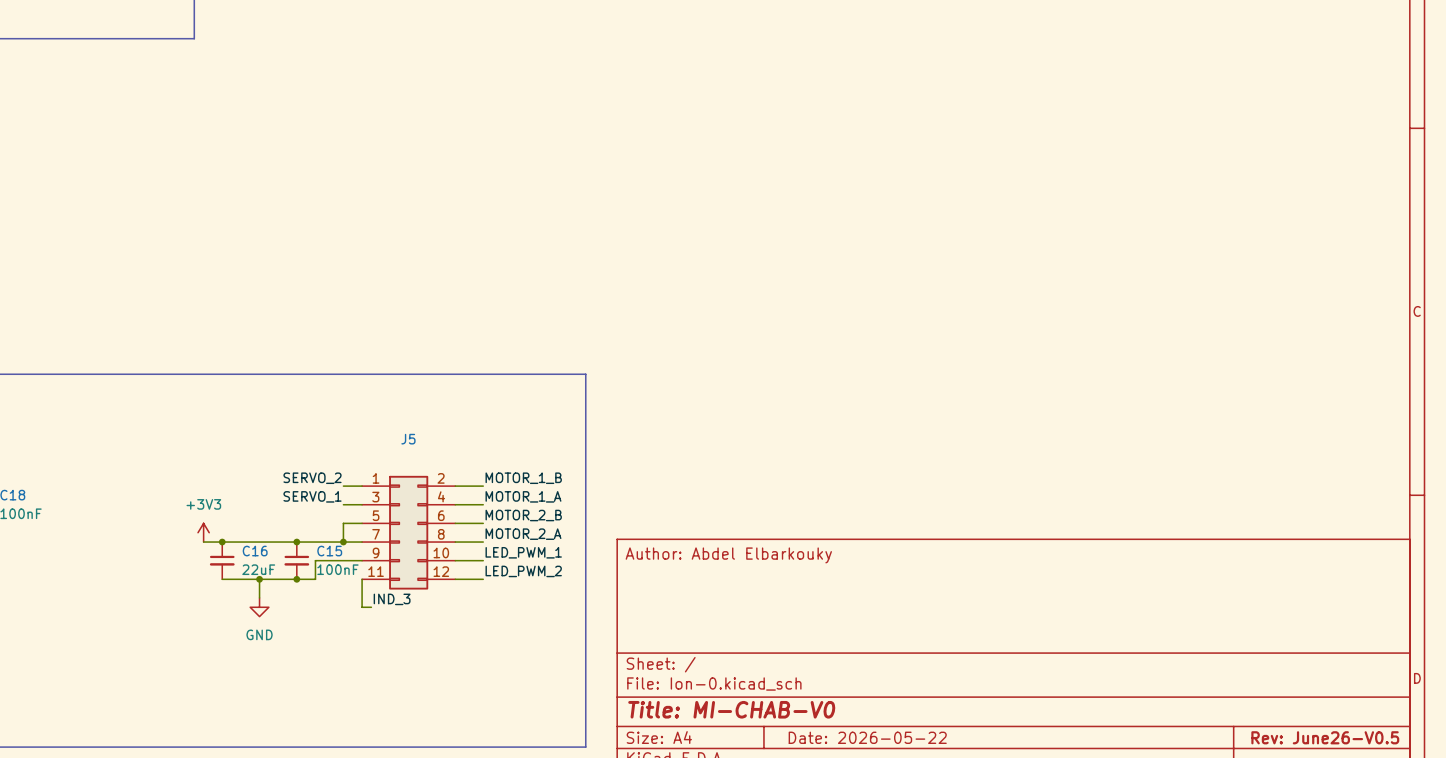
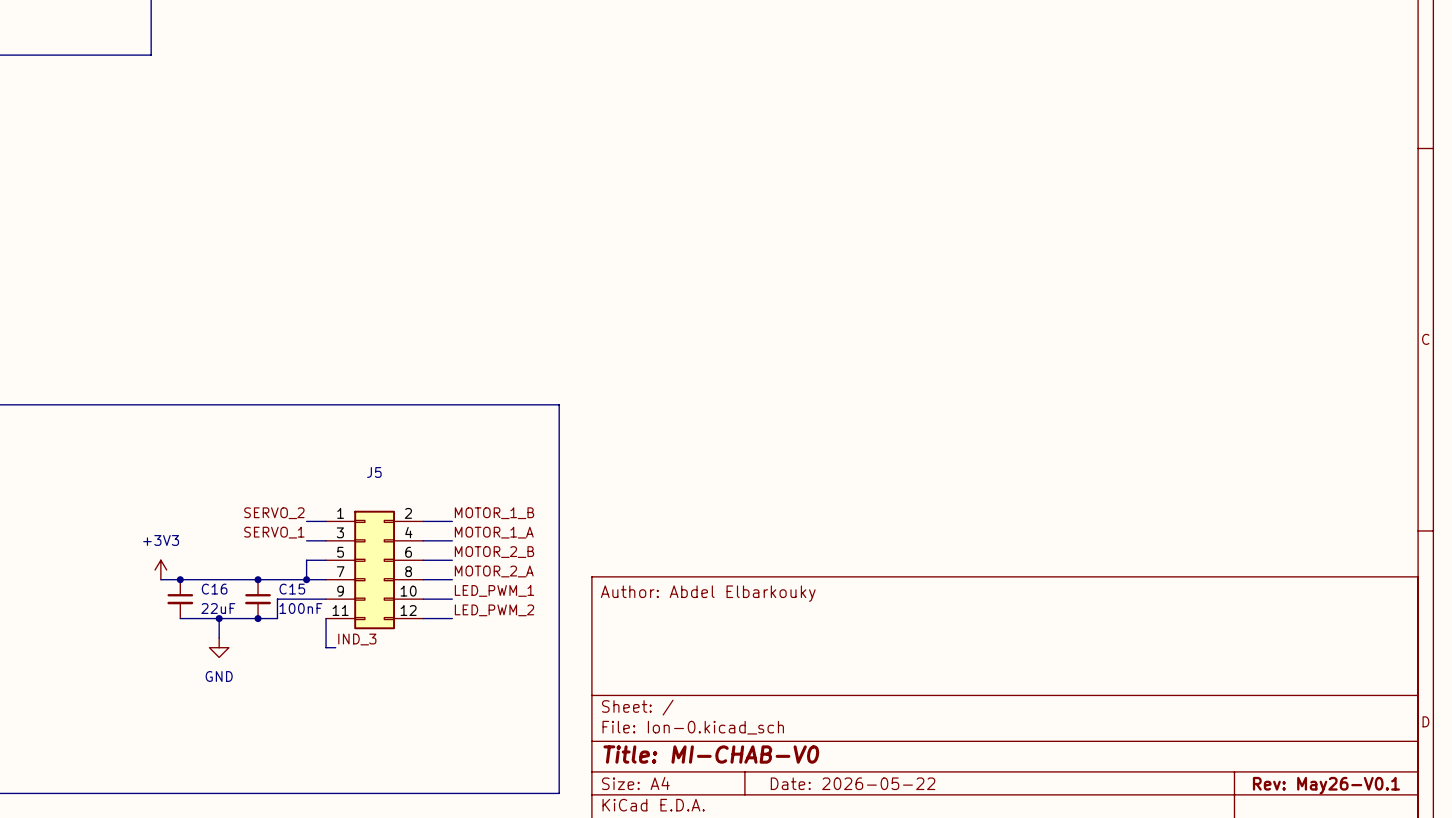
title block: Rev: June26-V0.5 (1325, 737) -> Rev: May26-V0.1 (1326, 785)

